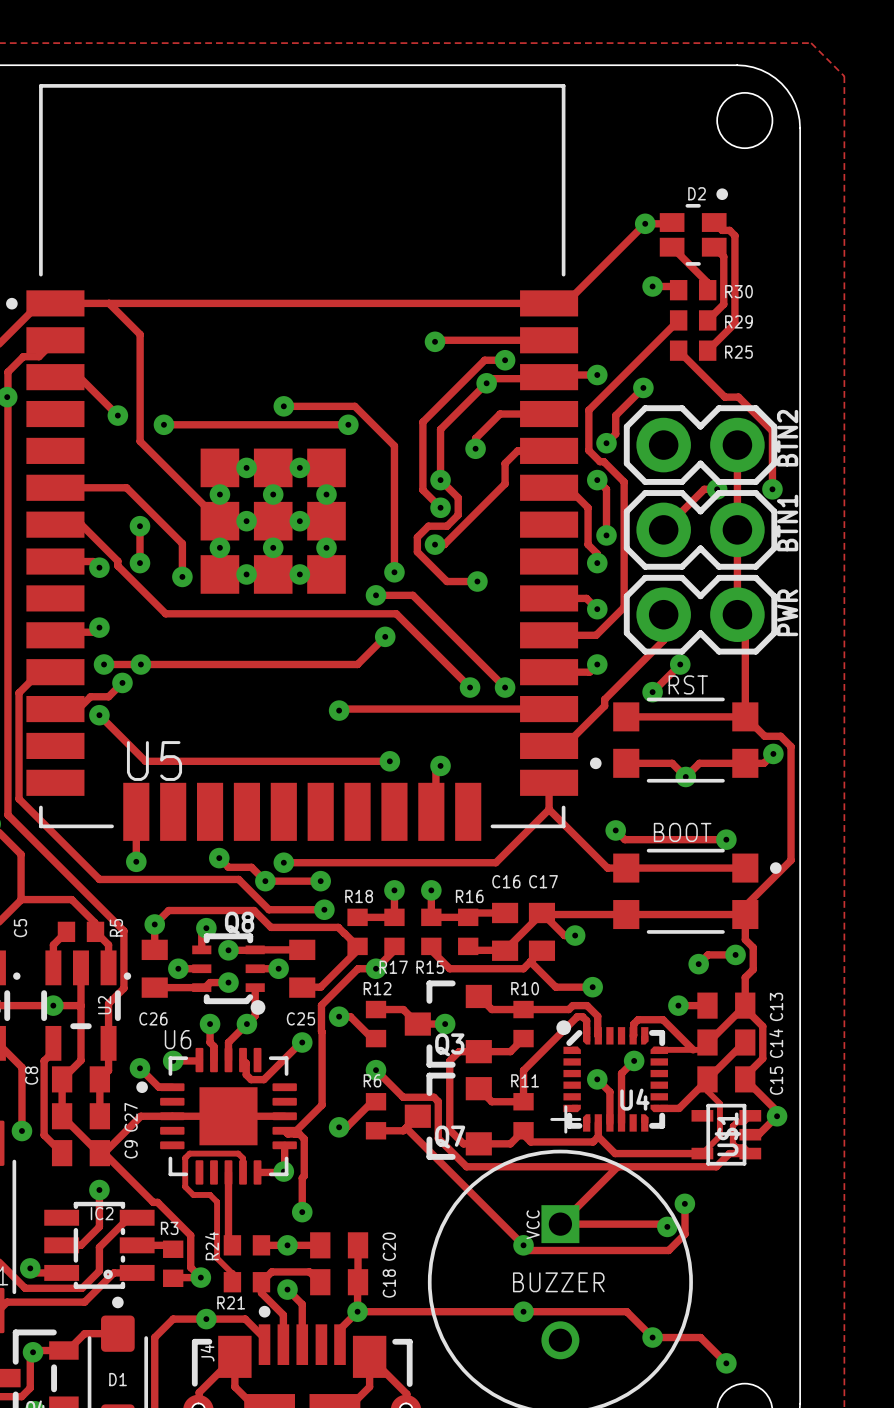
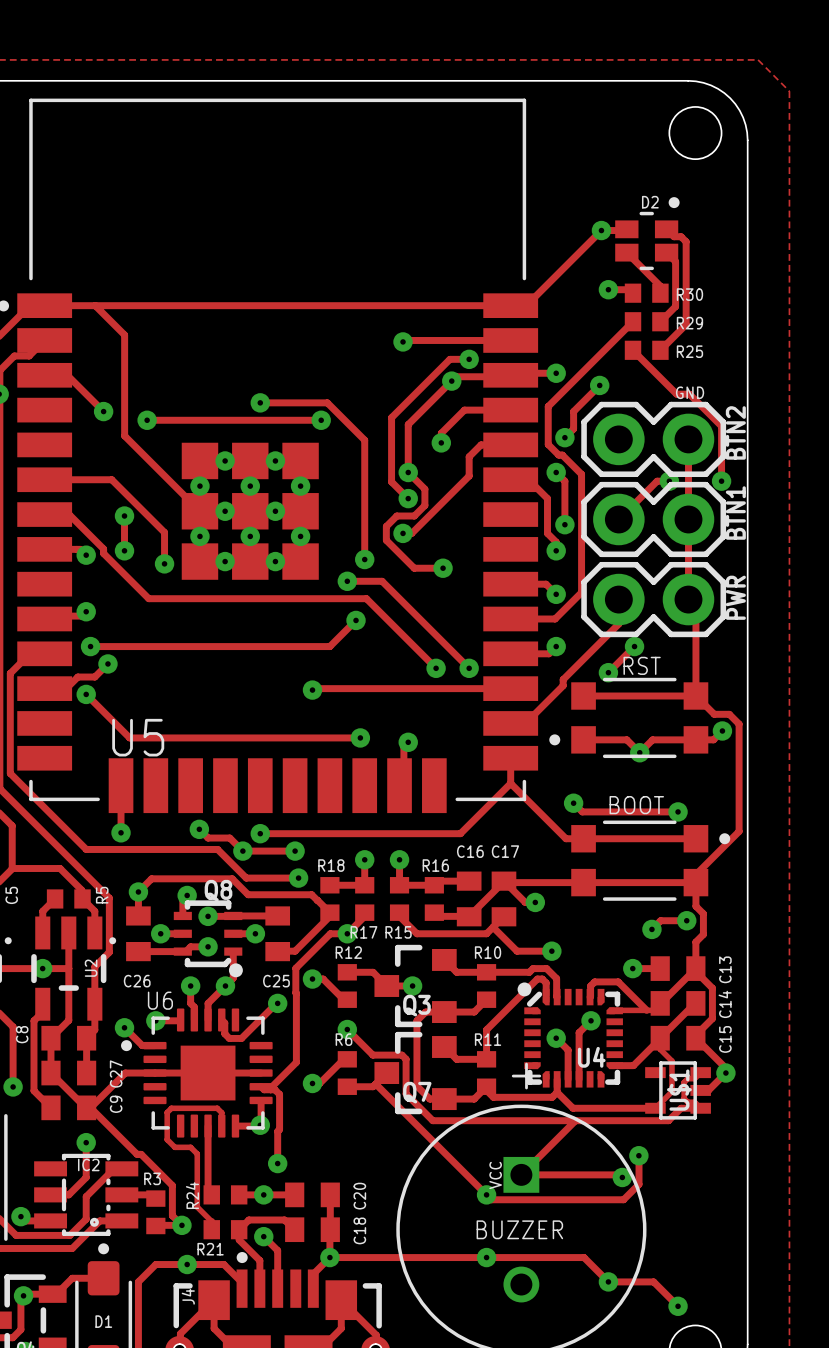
text: none -> GND (690, 392)
via: (140, 664) -> none

